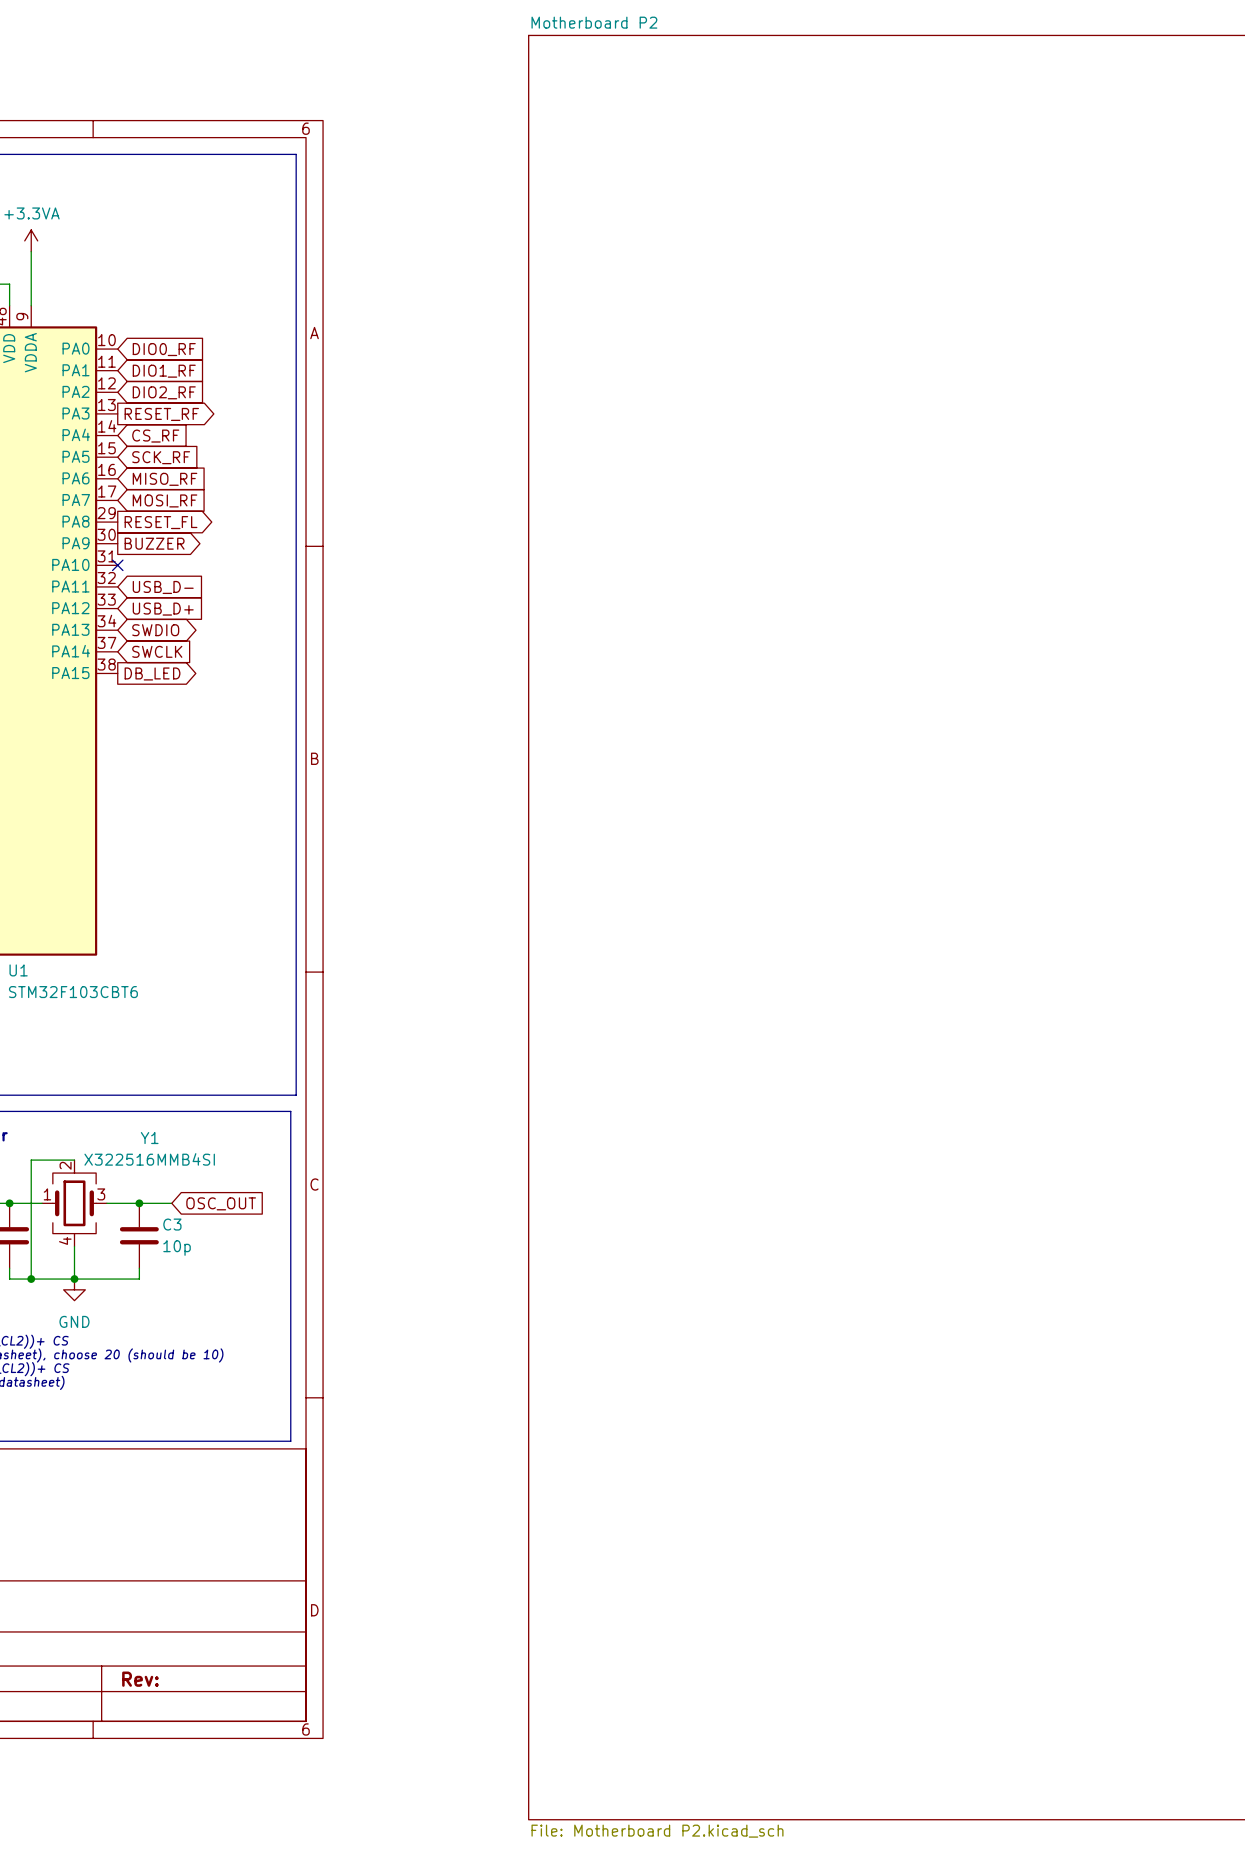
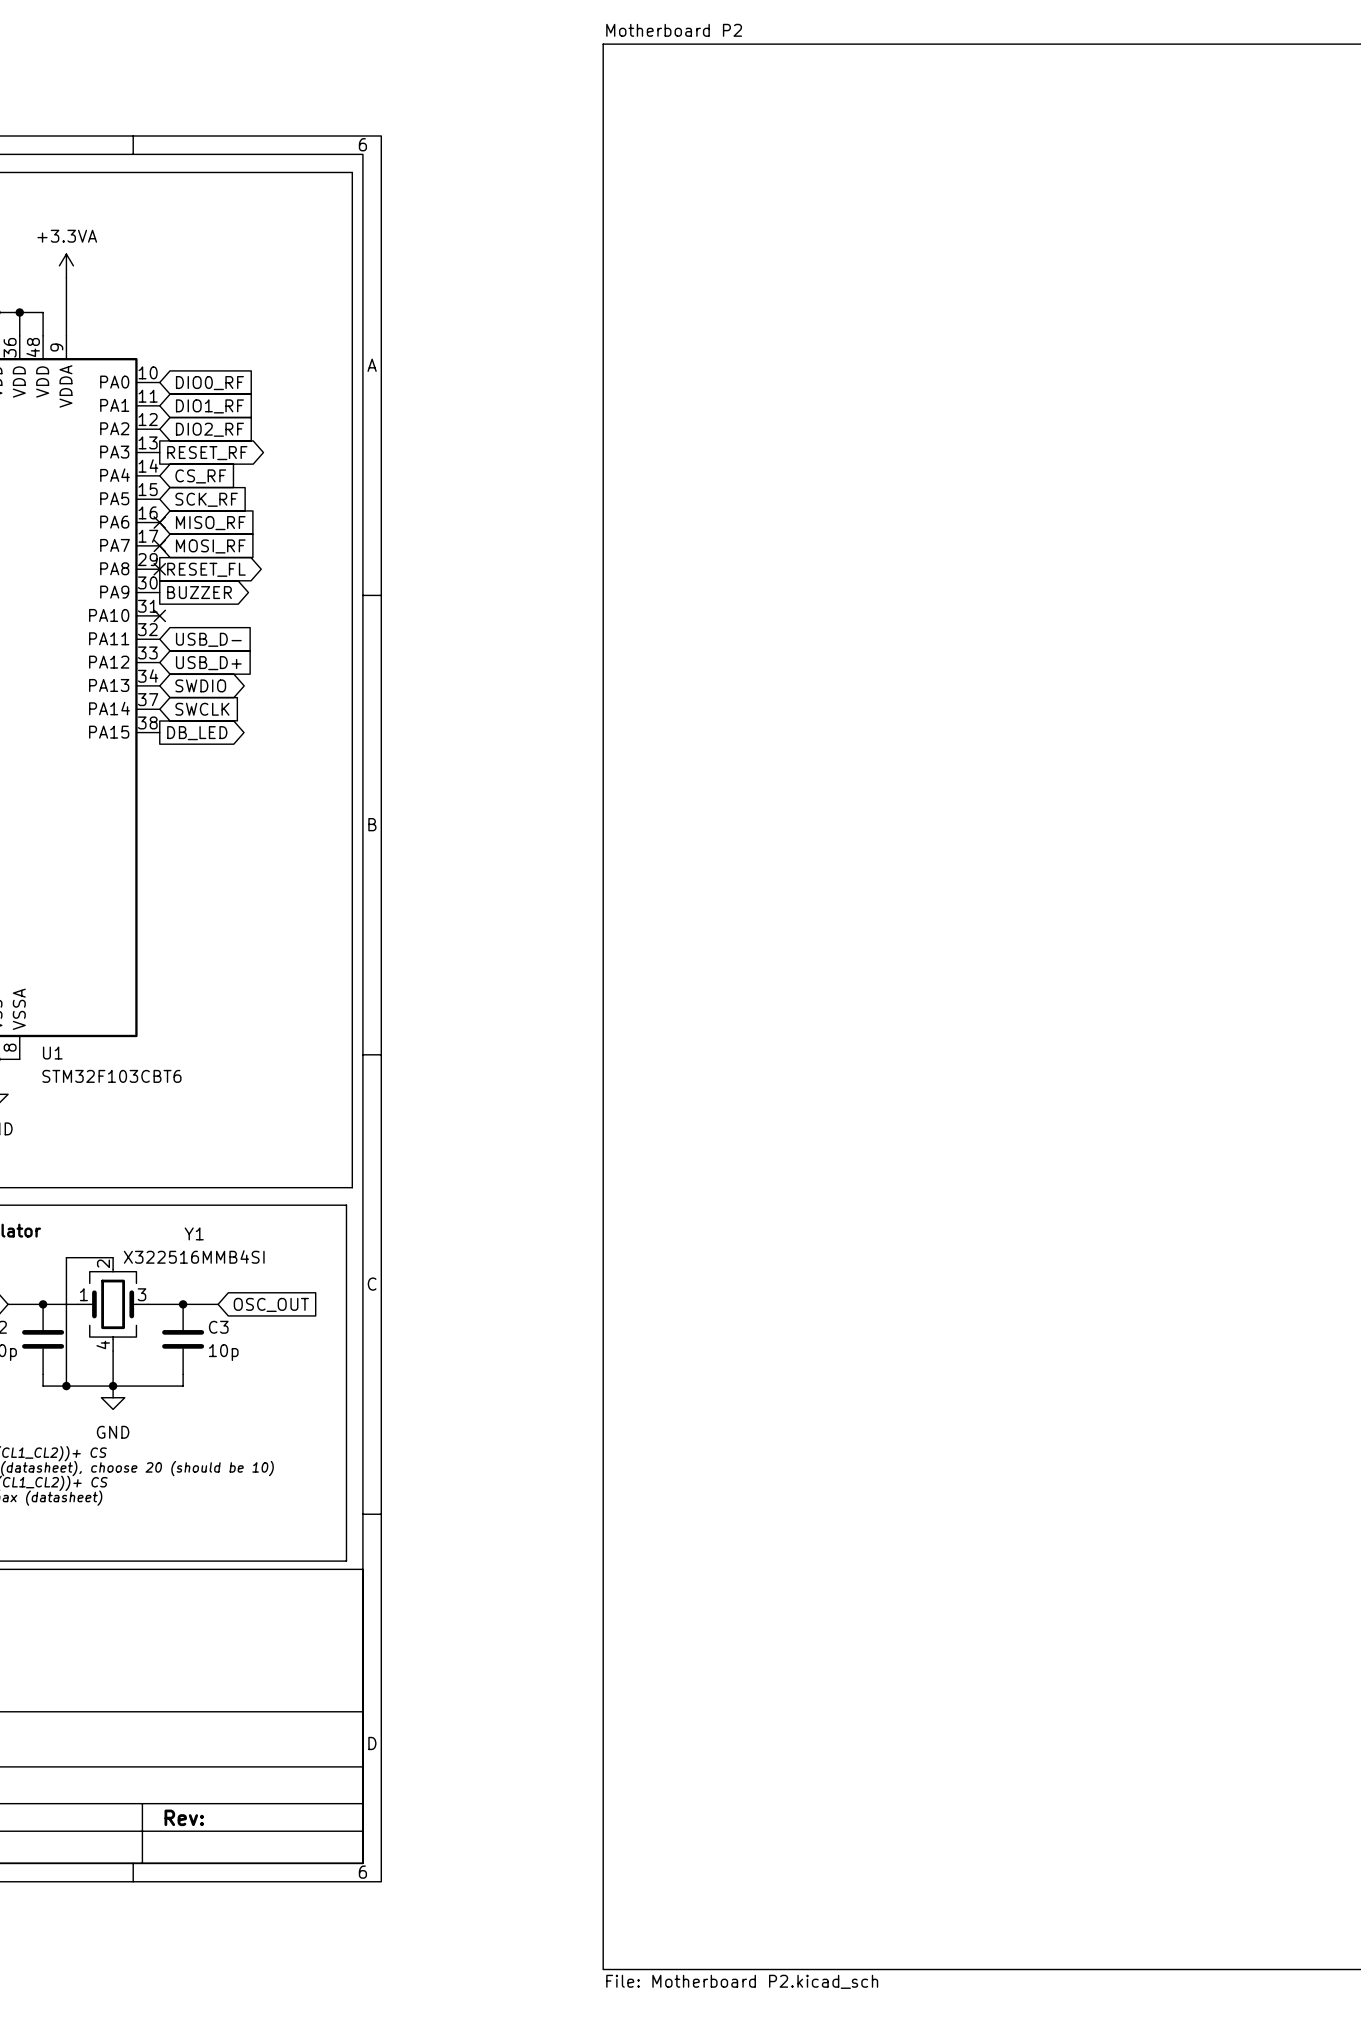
no-connect mark: none -> (159, 522)
no-connect mark: none -> (159, 545)
no-connect mark: none -> (159, 569)

